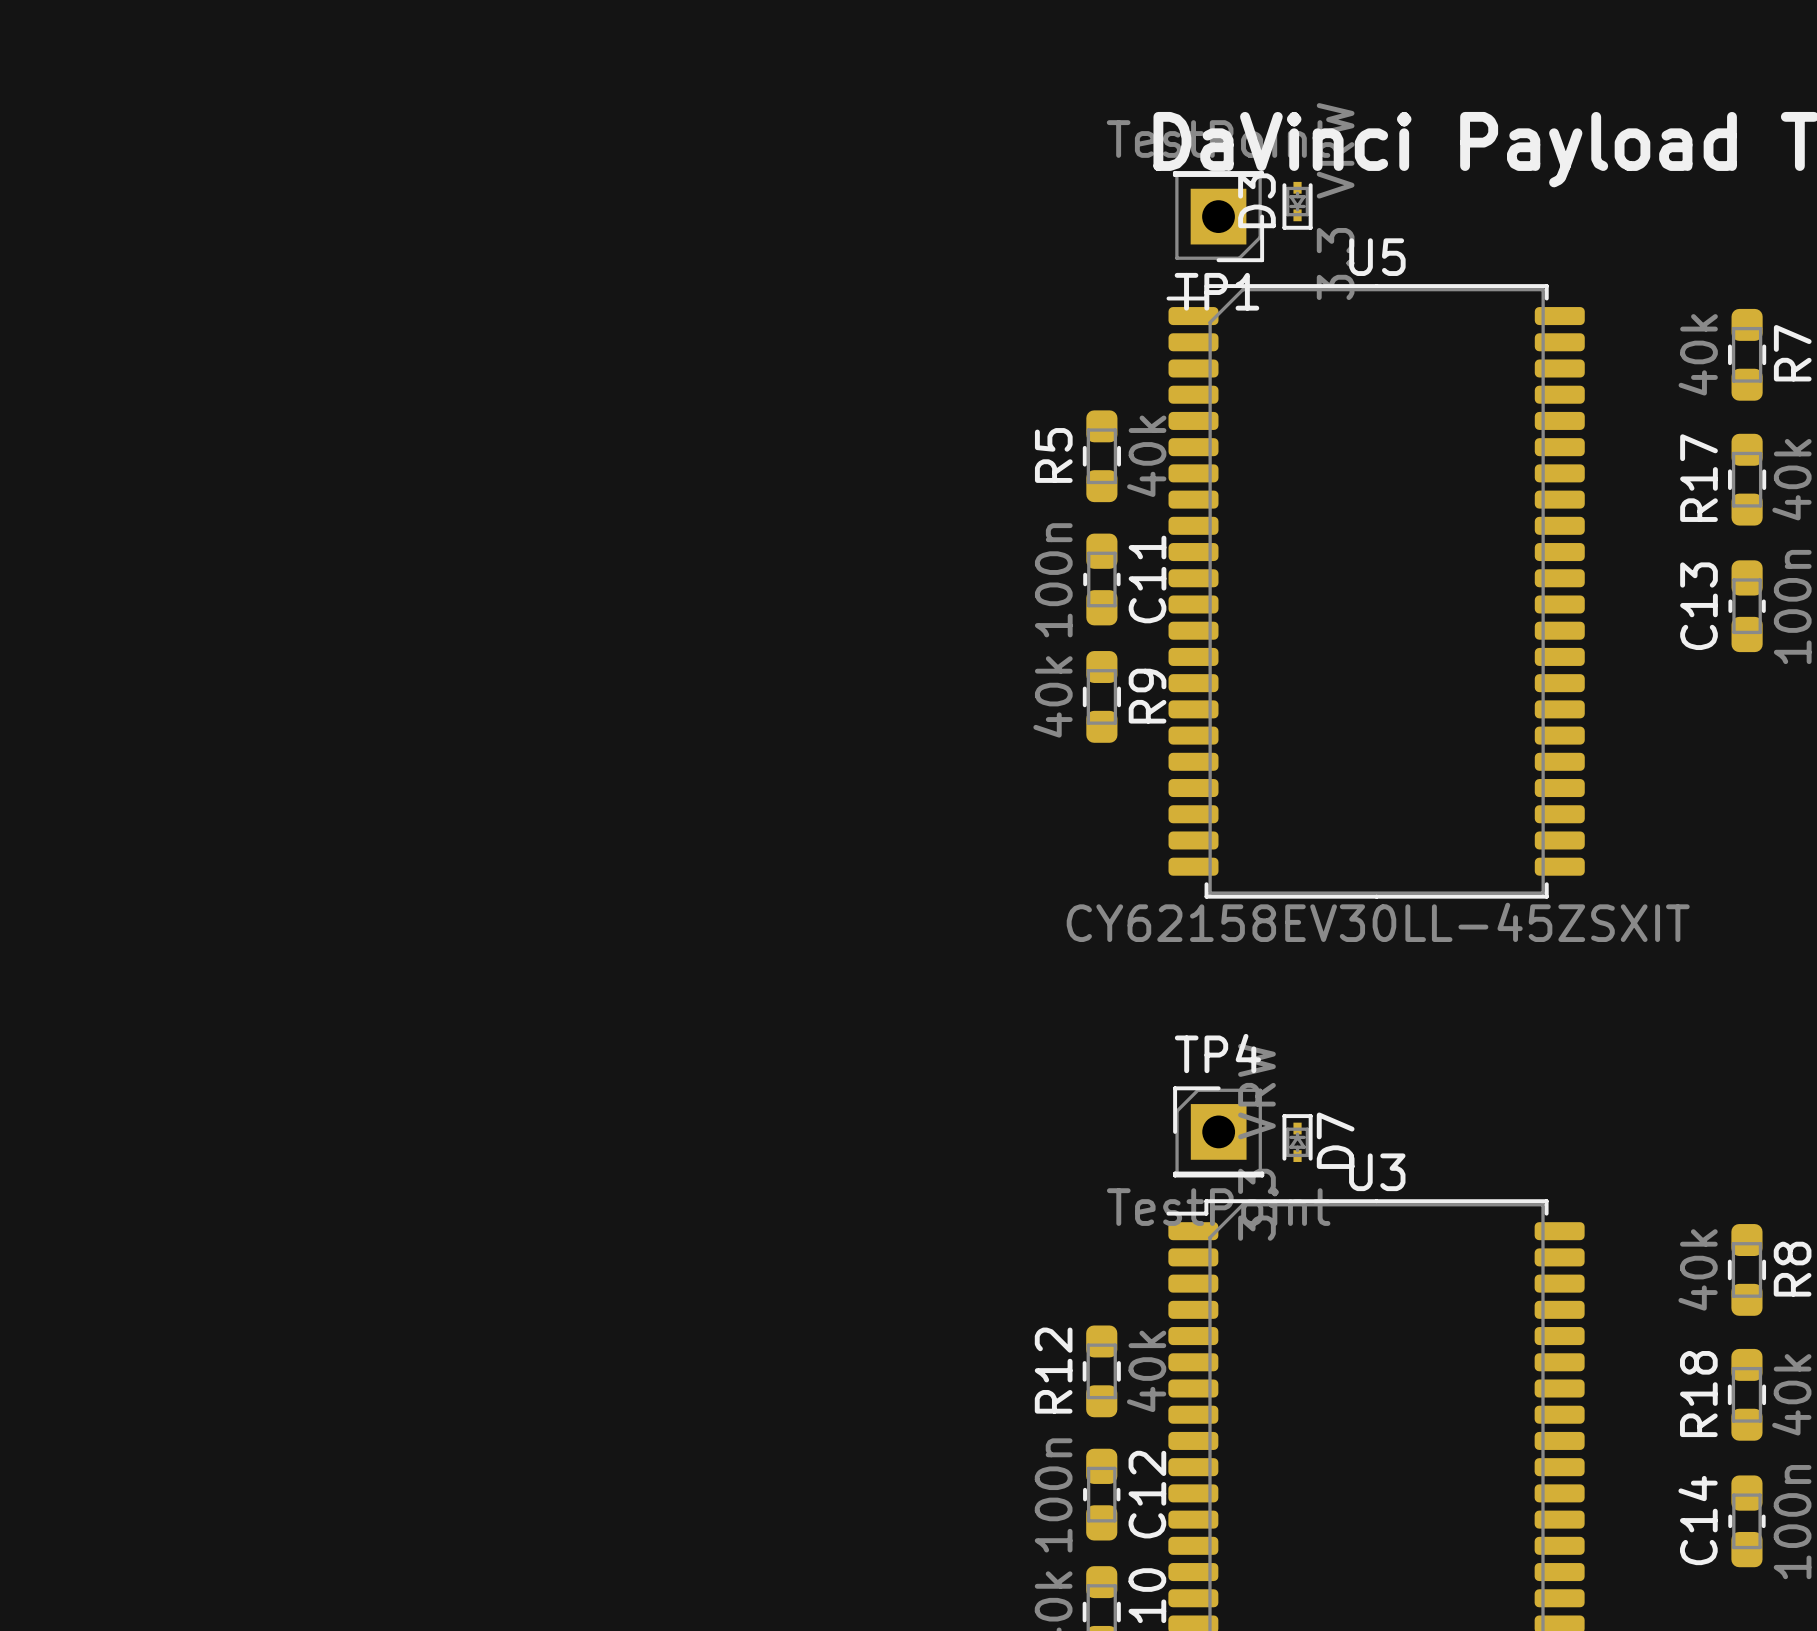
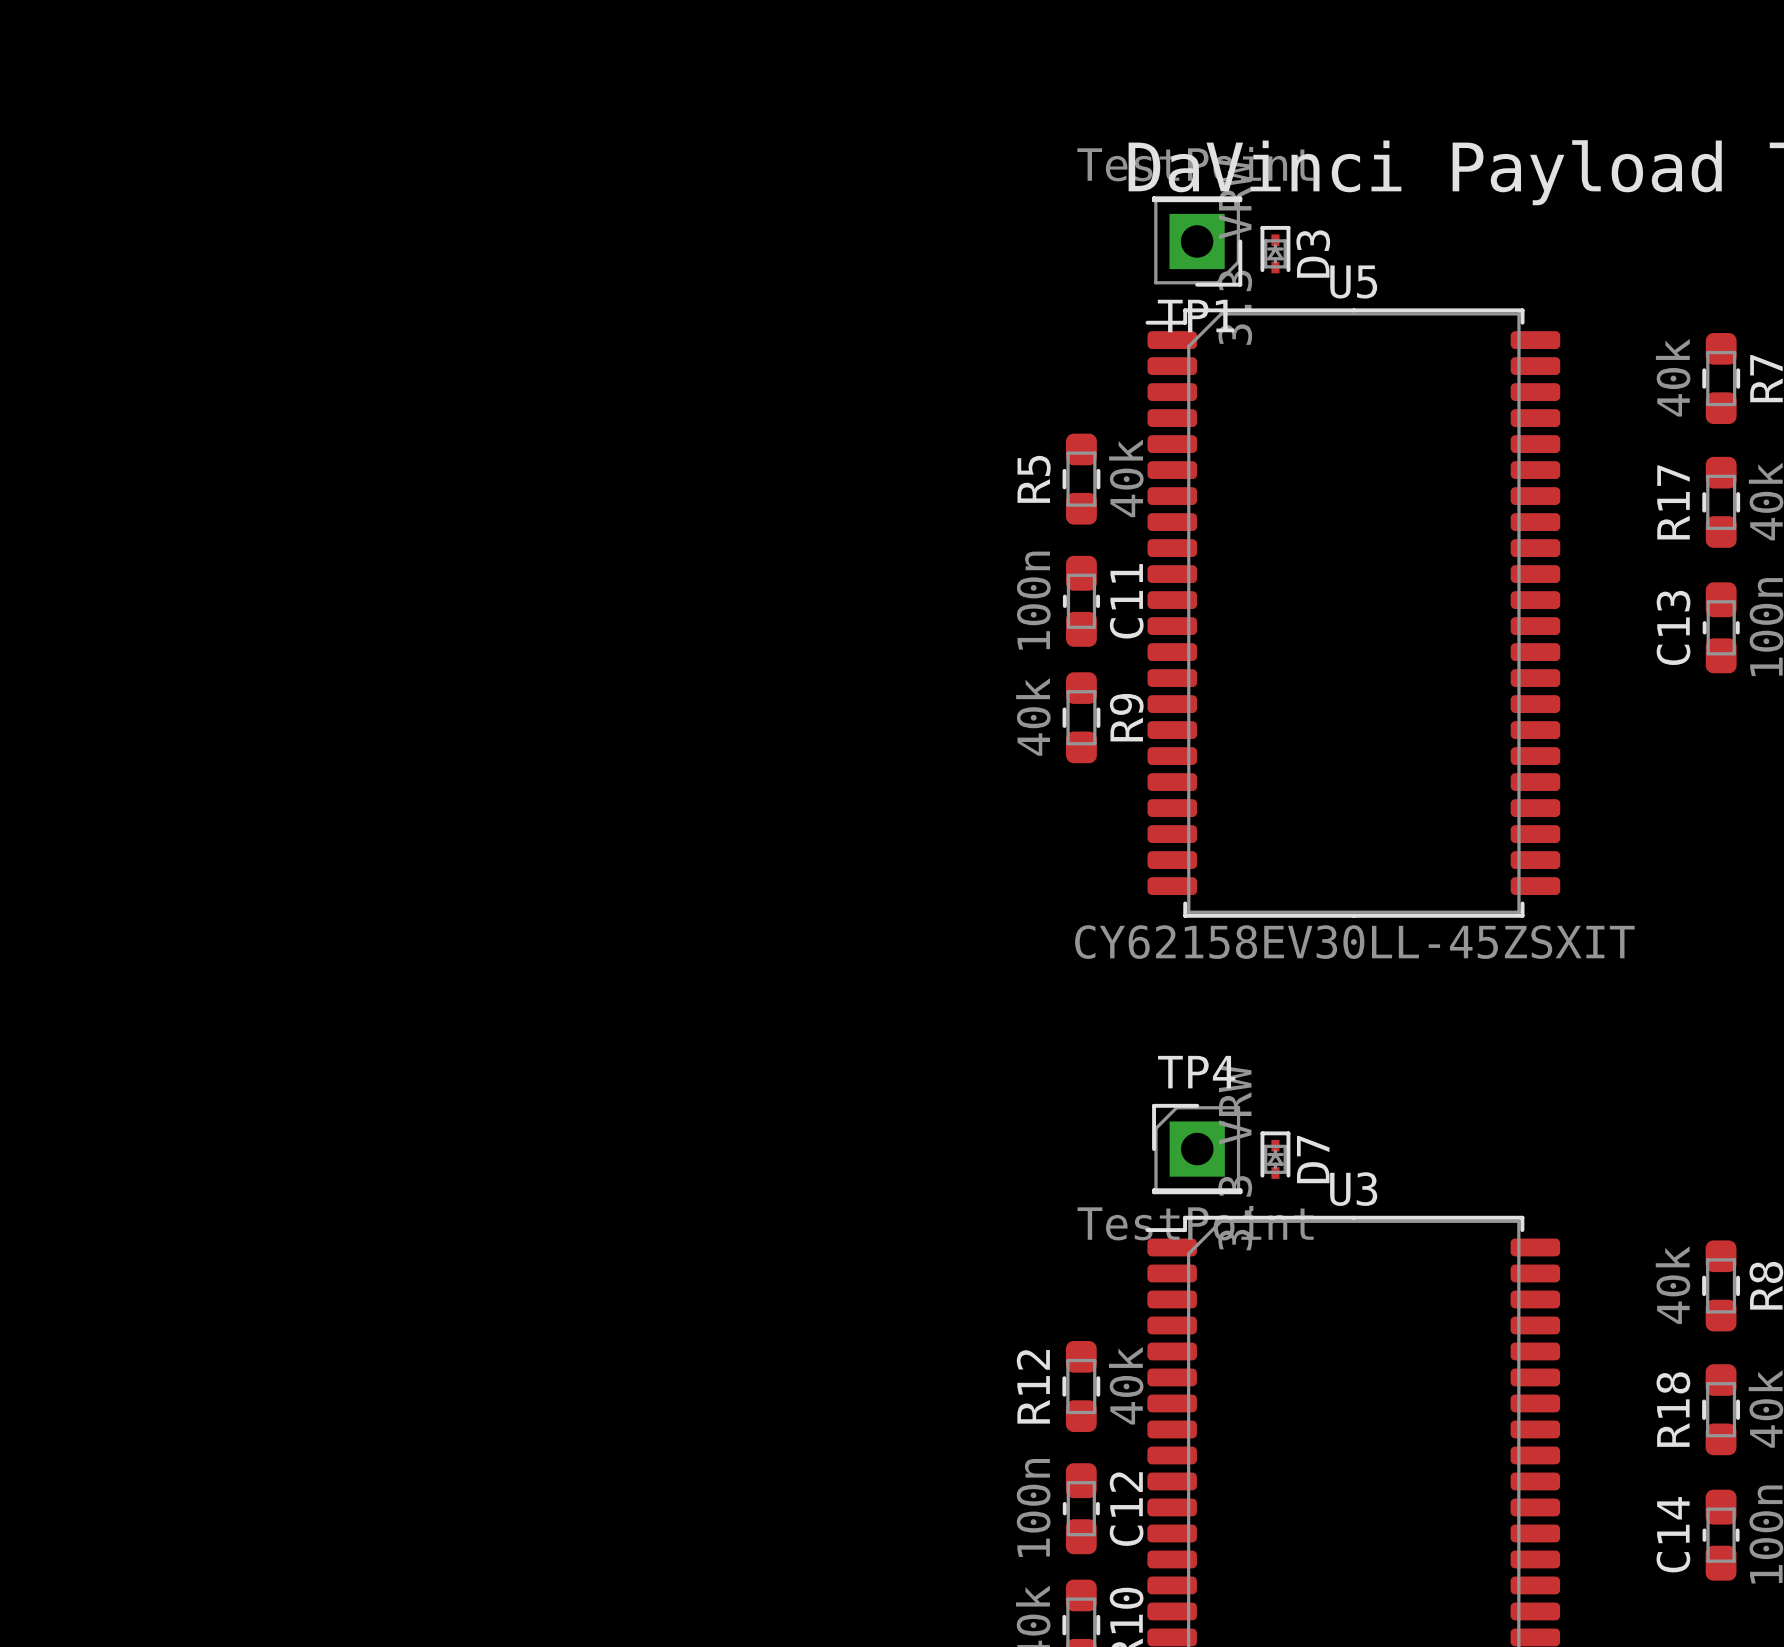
D3 rotation: 0° (1297, 205) -> 180° (1275, 249)

